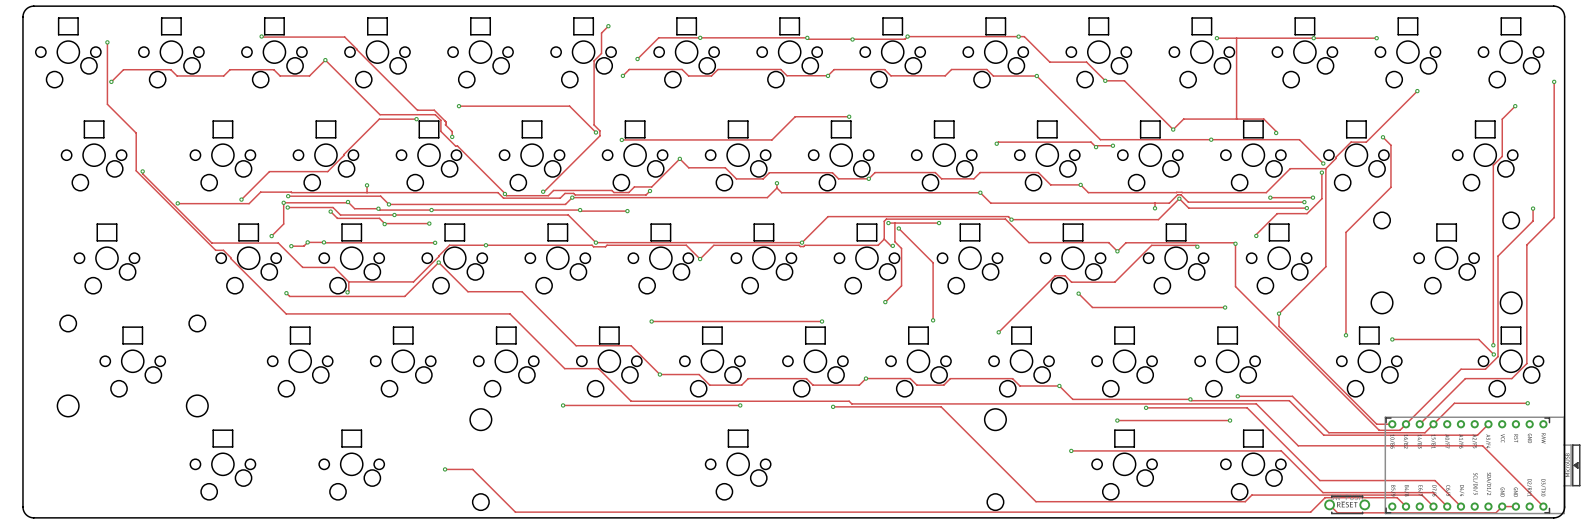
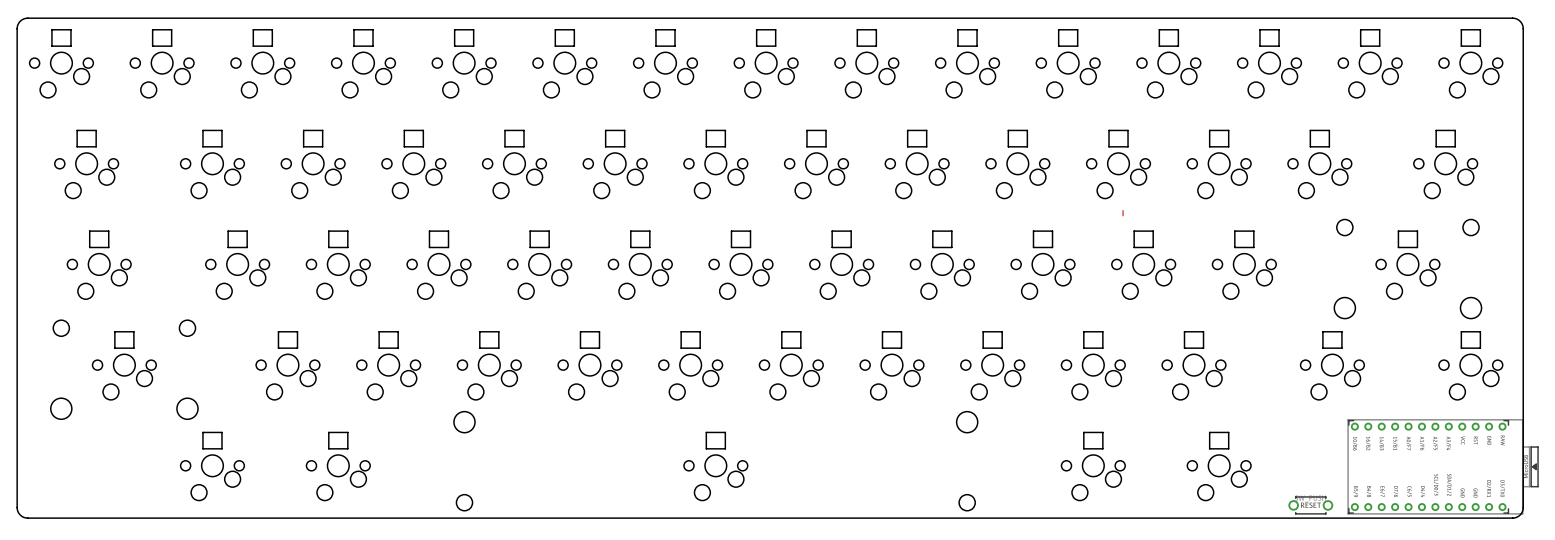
track: (608, 26) (601, 33) (601, 53) (594, 60) (594, 125) (599, 130) (599, 135) (543, 191) -> none
via: (608, 26) -> none
track: (261, 36) (344, 37) (417, 110) (434, 110) (446, 122) (445, 124) (452, 131) (452, 136) -> none
via: (261, 36) -> none
via: (907, 36) -> none
via: (1018, 36) -> none
via: (700, 37) -> none
via: (807, 37) -> none
track: (1216, 38) (1376, 38) -> none
via: (1216, 38) -> none
track: (1236, 38) (1236, 119) -> none
via: (1313, 38) -> none
via: (1376, 38) -> none
via: (852, 39) -> none
track: (107, 42) (107, 104) (136, 133) (136, 170) (215, 250) (223, 250) (286, 313) (510, 313) (564, 368) (598, 368) (631, 401) (849, 401) (851, 403) (1256, 403) (1298, 445) (1482, 445) (1543, 506) -> none
via: (107, 42) -> none
track: (637, 59) (658, 37) (904, 39) (907, 36) (1024, 36) (1049, 62) (1086, 62) (1105, 80) (1124, 80) (1173, 129) (1183, 119) (1263, 119) (1276, 133) -> none
via: (637, 59) -> none
via: (325, 60) -> none
via: (622, 75) -> none
track: (828, 75) (786, 75) (780, 69) (717, 69) (711, 75) (688, 75) (682, 69) (629, 69) (622, 75) -> none
track: (828, 75) (834, 69) (884, 69) (890, 75) (945, 75) (951, 69) (986, 69) (993, 76) (1036, 76) (1100, 139) (1299, 139) (1323, 163) -> none
via: (828, 75) -> none
via: (1036, 76) -> none
via: (1105, 80) -> none
track: (111, 81) (123, 69) (170, 69) (177, 75) (223, 75) (230, 69) (273, 69) (280, 75) (309, 75) (325, 60) (379, 114) (435, 114) (440, 120) (440, 131) (506, 195) (548, 195) (553, 190) (611, 190) (613, 192) (628, 192) (634, 186) (651, 186) (679, 158) (688, 167) (725, 167) (736, 178) (763, 178) (769, 172) (832, 172) (838, 178) (868, 178) (875, 172) (935, 172) (941, 178) (973, 178) (980, 172) (1038, 172) (1050, 184) (1080, 184) (1088, 192) (1266, 192) (1290, 168) (1325, 168) -> none
via: (111, 81) -> none
track: (1554, 81) (1554, 217) (1526, 244) (1526, 363) (1511, 378) (1465, 378) (1419, 424) -> none
via: (1554, 81) -> none
track: (1417, 91) (1366, 142) (1351, 142) (1325, 168) -> none
via: (1417, 91) -> none
track: (458, 106) (569, 106) (595, 132) -> none
via: (458, 106) -> none
track: (1515, 106) (1502, 119) (1502, 156) (1493, 165) (1493, 345) -> none
via: (1515, 106) -> none
track: (849, 116) (795, 116) (771, 139) (621, 139) -> none
via: (849, 116) -> none
track: (416, 119) (379, 119) (327, 171) (269, 171) (241, 199) -> none
via: (416, 119) -> none
via: (1173, 129) -> none
via: (595, 132) -> none
via: (1276, 133) -> none
via: (452, 136) -> none
track: (1382, 137) (1390, 145) (1390, 187) (1345, 232) (1345, 335) -> none
via: (1382, 137) -> none
via: (621, 139) -> none
via: (1211, 139) -> none
track: (996, 143) (998, 142) (1091, 142) (1096, 147) (1112, 145) -> none
via: (996, 143) -> none
via: (1112, 145) -> none
via: (1096, 147) -> none
via: (679, 158) -> none
via: (1323, 163) -> none
track: (1325, 168) (1325, 266) (1279, 313) (1279, 326) (1376, 424) (1392, 424) -> none
track: (142, 171) (142, 173) (211, 243) (278, 243) (302, 267) (334, 267) (348, 281) -> none
via: (142, 171) -> none
track: (1321, 172) (1321, 198) (1307, 213) (1277, 213) (1256, 235) -> none
via: (1321, 172) -> none
via: (868, 178) -> none
track: (776, 183) (776, 188) -> none
via: (776, 183) -> none
via: (1080, 184) -> none
track: (367, 185) (367, 192) -> none
via: (367, 185) -> none
track: (776, 188) (781, 192) (980, 192) (990, 203) (1169, 203) (1177, 194) (1180, 194) (1188, 202) (1304, 202) -> none
track: (776, 188) (767, 197) (572, 197) (565, 204) (388, 204) (380, 196) (288, 196) -> none
via: (543, 191) -> none
track: (649, 191) (646, 194) (565, 193) (560, 198) (503, 198) (498, 192) (260, 192) (249, 203) (177, 203) -> none
via: (649, 191) -> none
via: (980, 192) -> none
via: (504, 194) -> none
via: (288, 196) -> none
via: (572, 197) -> none
track: (1270, 197) (1312, 197) -> none
via: (1270, 197) -> none
via: (1312, 197) -> none
via: (1179, 198) -> none
via: (241, 199) -> none
via: (283, 202) -> none
via: (348, 202) -> none
via: (1304, 202) -> none
via: (177, 203) -> none
via: (388, 204) -> none
track: (287, 207) (333, 207) (340, 215) (568, 215) (595, 242) (802, 242) (828, 216) (1008, 216) (1011, 219) (1158, 219) (1179, 198) (1188, 208) (1306, 208) -> none
via: (287, 207) -> none
via: (378, 208) -> none
via: (1155, 208) -> none
via: (1306, 208) -> none
track: (1533, 208) (1533, 221) (1498, 256) (1498, 356) (1485, 369) (1461, 369) (1399, 430) (1379, 430) (1235, 286) (1234, 242) (1125, 242) (1117, 251) (1108, 242) (1028, 242) (1005, 219) (886, 219) (884, 221) (884, 239) -> none
via: (1533, 208) -> none
via: (431, 210) -> none
via: (580, 210) -> none
track: (330, 211) (337, 218) (379, 218) (384, 223) -> none
via: (330, 211) -> none
track: (627, 211) (379, 210) (354, 208) (348, 202) (283, 202) (283, 224) (271, 236) -> none
via: (627, 211) -> none
via: (394, 215) -> none
via: (1011, 219) -> none
track: (384, 223) (429, 223) -> none
via: (429, 223) -> none
track: (888, 223) (939, 223) -> none
via: (888, 223) -> none
track: (894, 223) (894, 241) (901, 248) (901, 285) (885, 302) -> none
via: (939, 223) -> none
via: (384, 224) -> none
track: (898, 228) (933, 262) (933, 320) -> none
via: (898, 228) -> none
via: (1256, 235) -> none
via: (271, 236) -> none
track: (884, 239) (892, 245) -> none
track: (884, 239) (878, 245) (713, 245) (700, 259) (686, 245) (607, 245) (605, 246) (449, 245) (413, 281) (348, 281) -> none
via: (307, 242) -> none
via: (323, 242) -> none
track: (435, 242) (307, 242) (303, 246) (291, 246) -> none
via: (435, 242) -> none
via: (595, 242) -> none
via: (802, 242) -> none
via: (1235, 243) -> none
via: (485, 245) -> none
via: (892, 245) -> none
via: (291, 246) -> none
track: (1197, 246) (1151, 245) (1114, 282) (1071, 282) (1065, 275) (1055, 275) (998, 332) -> none
via: (1197, 246) -> none
via: (1117, 251) -> none
via: (700, 259) -> none
via: (438, 262) -> none
track: (348, 281) (347, 292) -> none
via: (347, 292) -> none
track: (286, 293) (289, 296) (404, 296) (438, 262) (467, 291) (522, 291) (576, 345) (631, 345) (659, 374) (699, 374) (709, 385) (741, 385) (748, 378) (806, 378) (813, 385) (859, 385) (865, 378) (910, 378) (916, 385) (943, 385) (950, 378) (1012, 378) (1019, 385) (1059, 385) (1072, 399) (1289, 400) (1323, 435) (1477, 435) (1488, 424) -> none
via: (286, 293) -> none
track: (1078, 293) (1092, 307) (1225, 307) -> none
via: (1078, 293) -> none
via: (885, 302) -> none
via: (1225, 307) -> none
via: (1279, 313) -> none
via: (933, 320) -> none
track: (651, 321) (822, 321) -> none
via: (651, 321) -> none
via: (822, 321) -> none
via: (998, 332) -> none
via: (1345, 335) -> none
track: (1392, 339) (1478, 339) (1493, 354) -> none
via: (1392, 339) -> none
via: (1493, 345) -> none
via: (1493, 354) -> none
via: (659, 374) -> none
via: (865, 378) -> none
via: (1059, 385) -> none
track: (1237, 396) (1292, 396) (1328, 432) (1424, 432) (1454, 403) (1527, 403) -> none
via: (1237, 396) -> none
via: (1190, 399) -> none
via: (1527, 403) -> none
track: (563, 405) (740, 405) -> none
via: (563, 405) -> none
via: (740, 405) -> none
track: (833, 406) (941, 406) (1035, 501) (1245, 501) (1251, 495) (1421, 495) (1433, 506) -> none
via: (833, 406) -> none
track: (1146, 407) (1247, 407) (1319, 480) (1434, 480) (1460, 506) -> none
via: (1146, 407) -> none
track: (1117, 420) (1230, 420) -> none
via: (1117, 420) -> none
via: (1230, 420) -> none
track: (1071, 450) (1281, 450) (1323, 492) (1433, 492) (1447, 506) -> none
via: (1071, 450) -> none
track: (445, 469) (472, 469) (515, 512) (1310, 512) (1325, 497) (1397, 497) (1406, 506) -> none
via: (445, 469) -> none
track: (1329, 504) (1337, 512) (1495, 512) (1502, 506) (1515, 506) -> none

